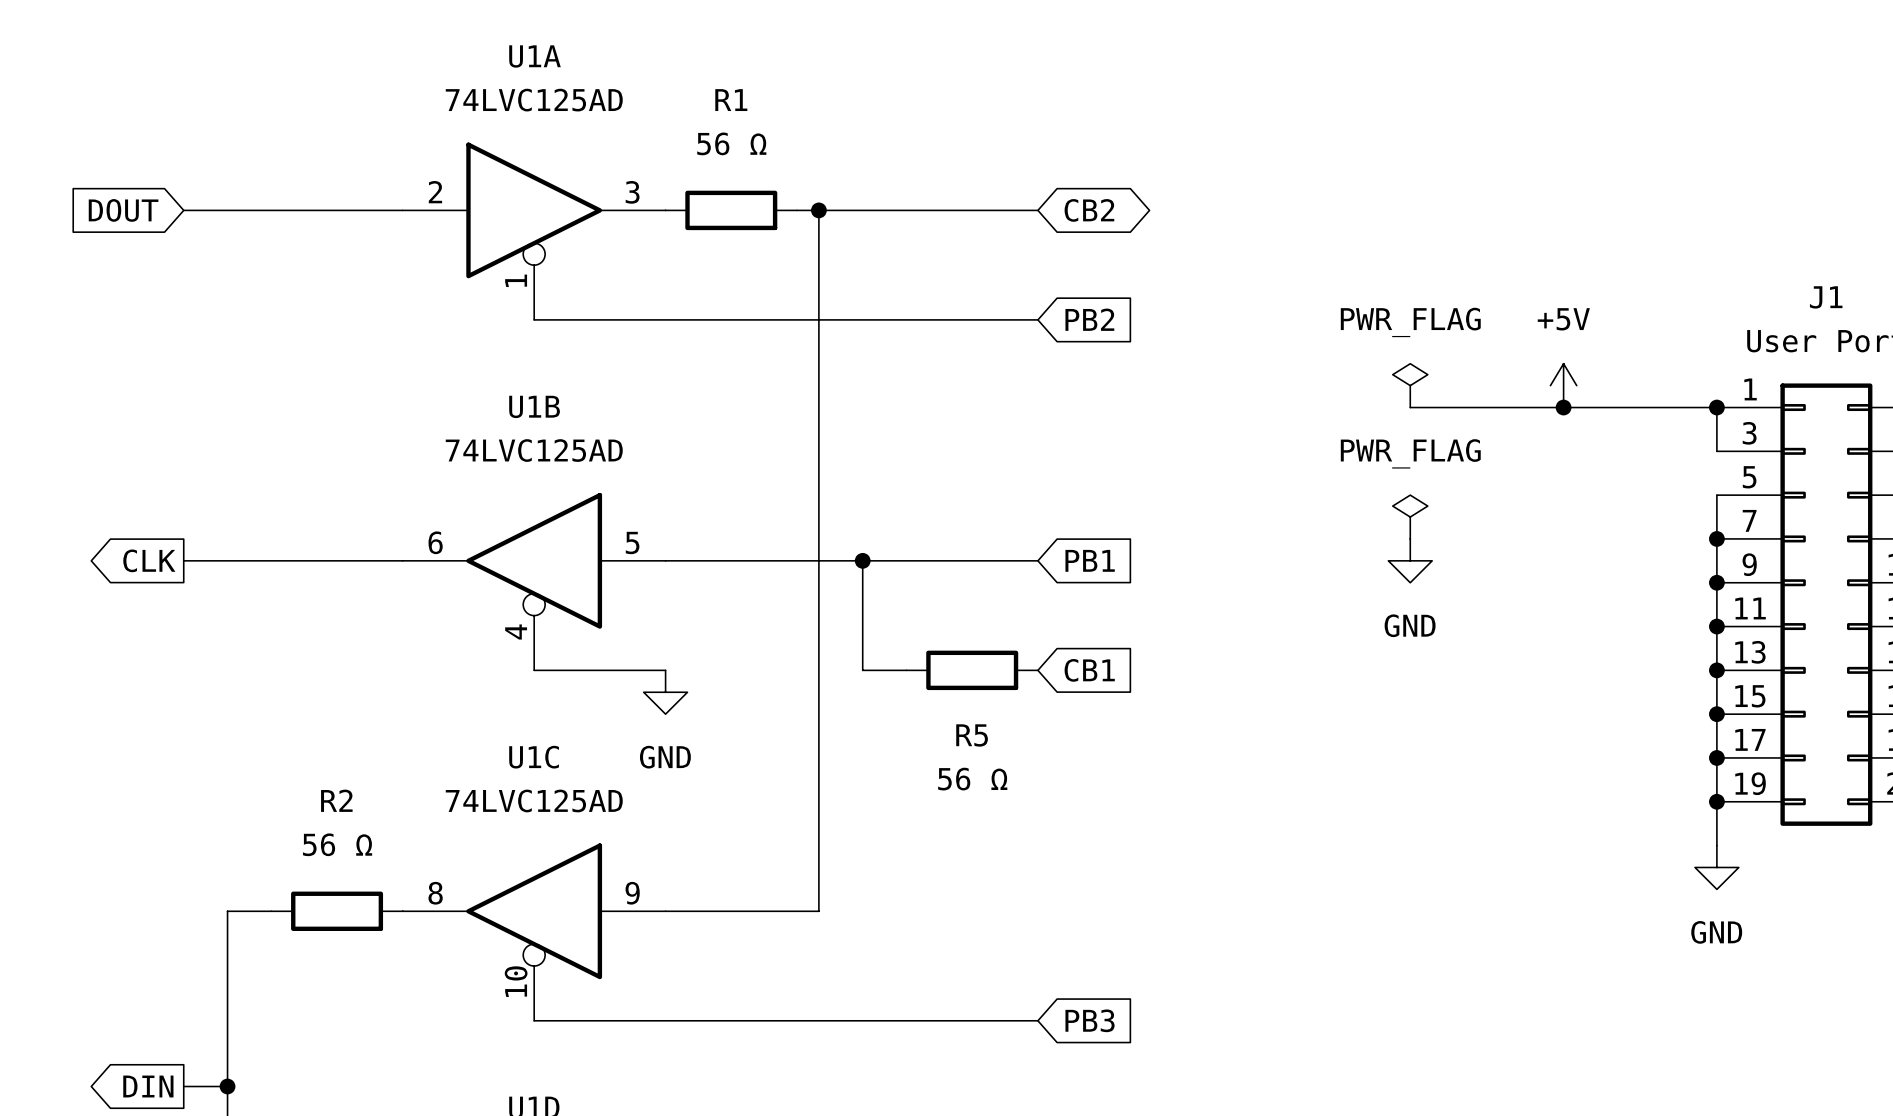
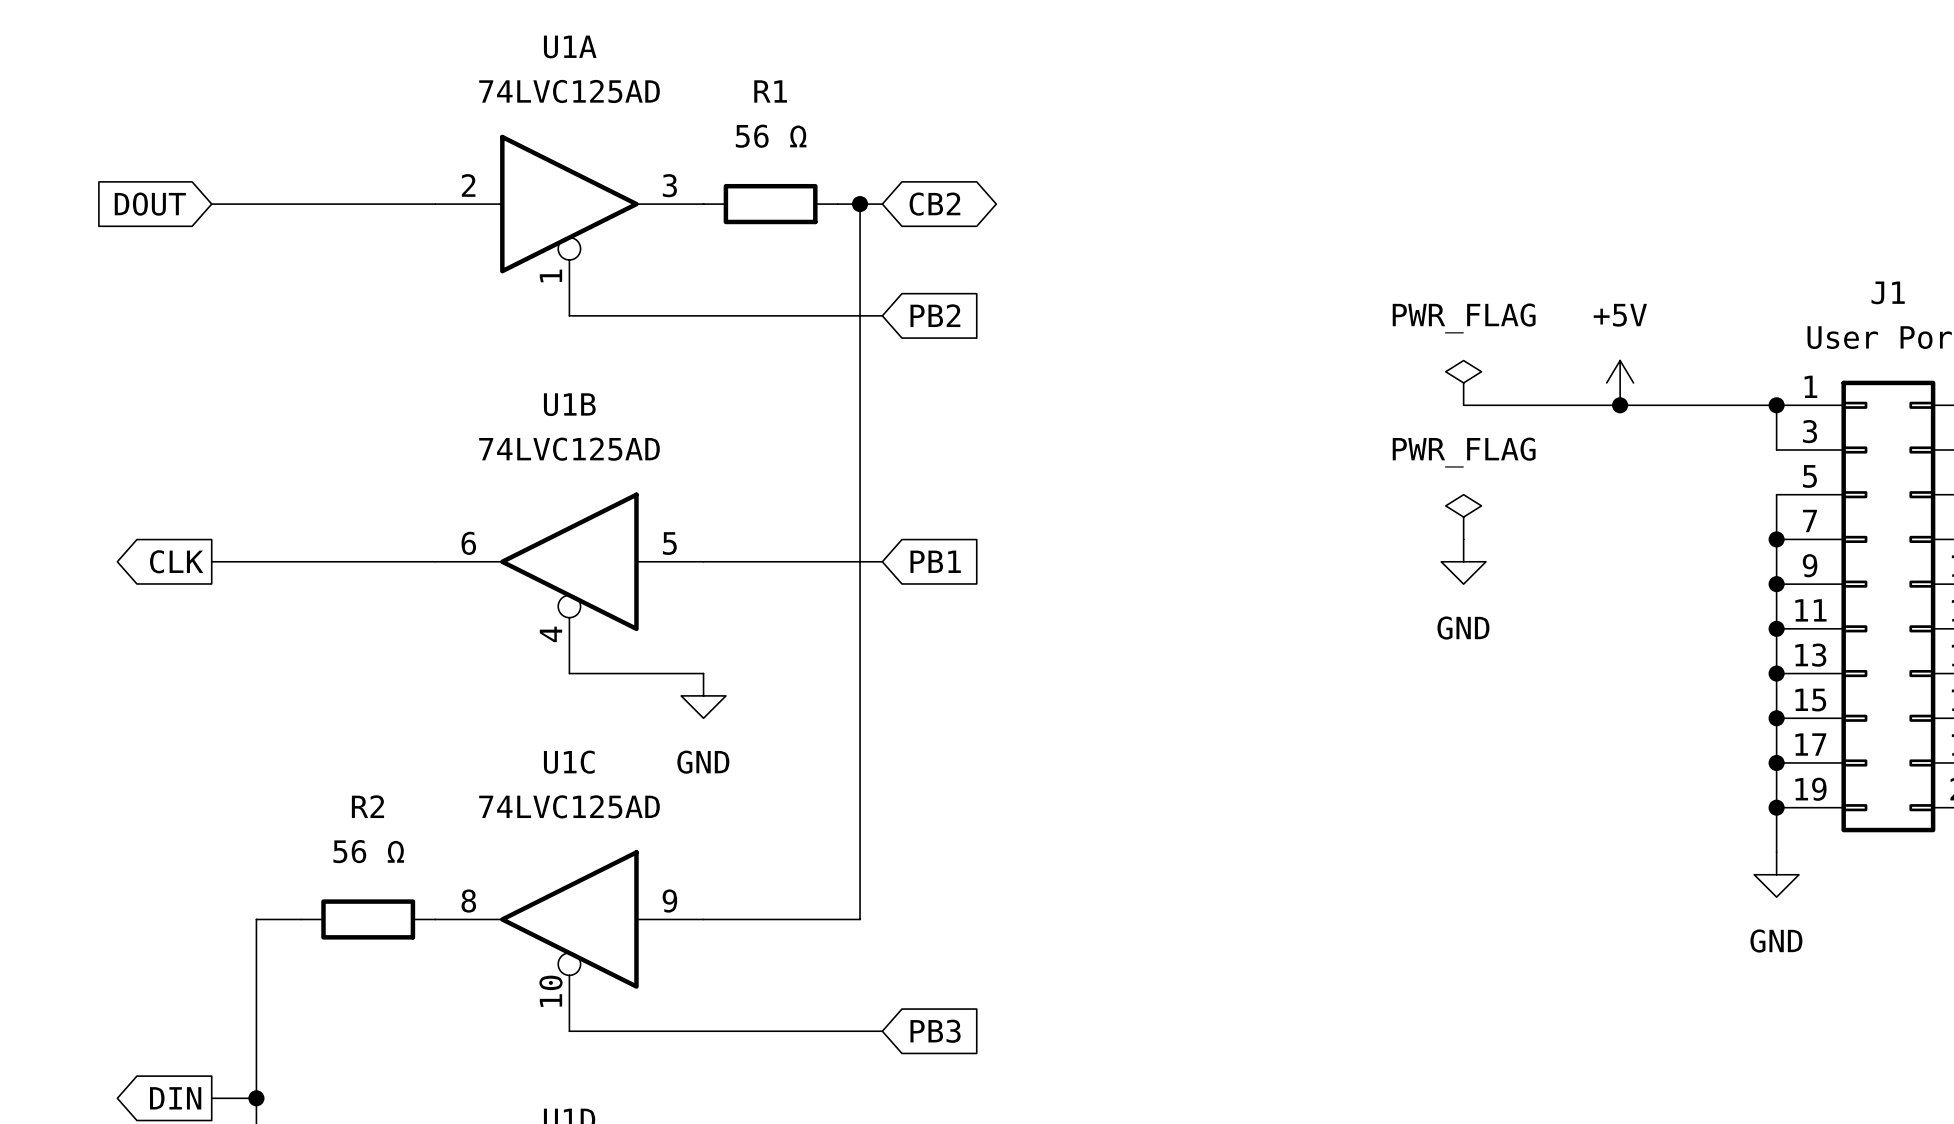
wire: (840, 210) (1037, 210) -> none
global label position: CB2 (1089, 210) -> CB2 (934, 204)
wire: (840, 319) (1037, 319) -> none
global label position: PB2 (1089, 319) -> PB2 (935, 315)
wire: (840, 560) (1037, 560) -> none
wire: (862, 560) (862, 670) (906, 670) -> none
junction: (862, 560) -> none
global label position: PB1 (1090, 560) -> PB1 (935, 561)
R5: 56 Ω (972, 670) -> none
global label: CB1 (1089, 670) -> none
wire: (840, 1020) (1037, 1020) -> none
global label position: PB3 (1090, 1020) -> PB3 (935, 1031)

